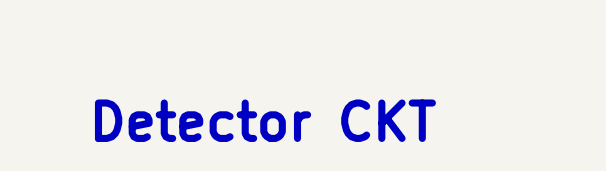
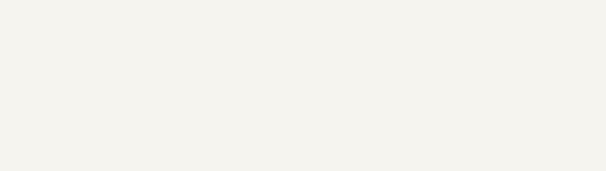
text: Detector CKT (265, 120) -> none

